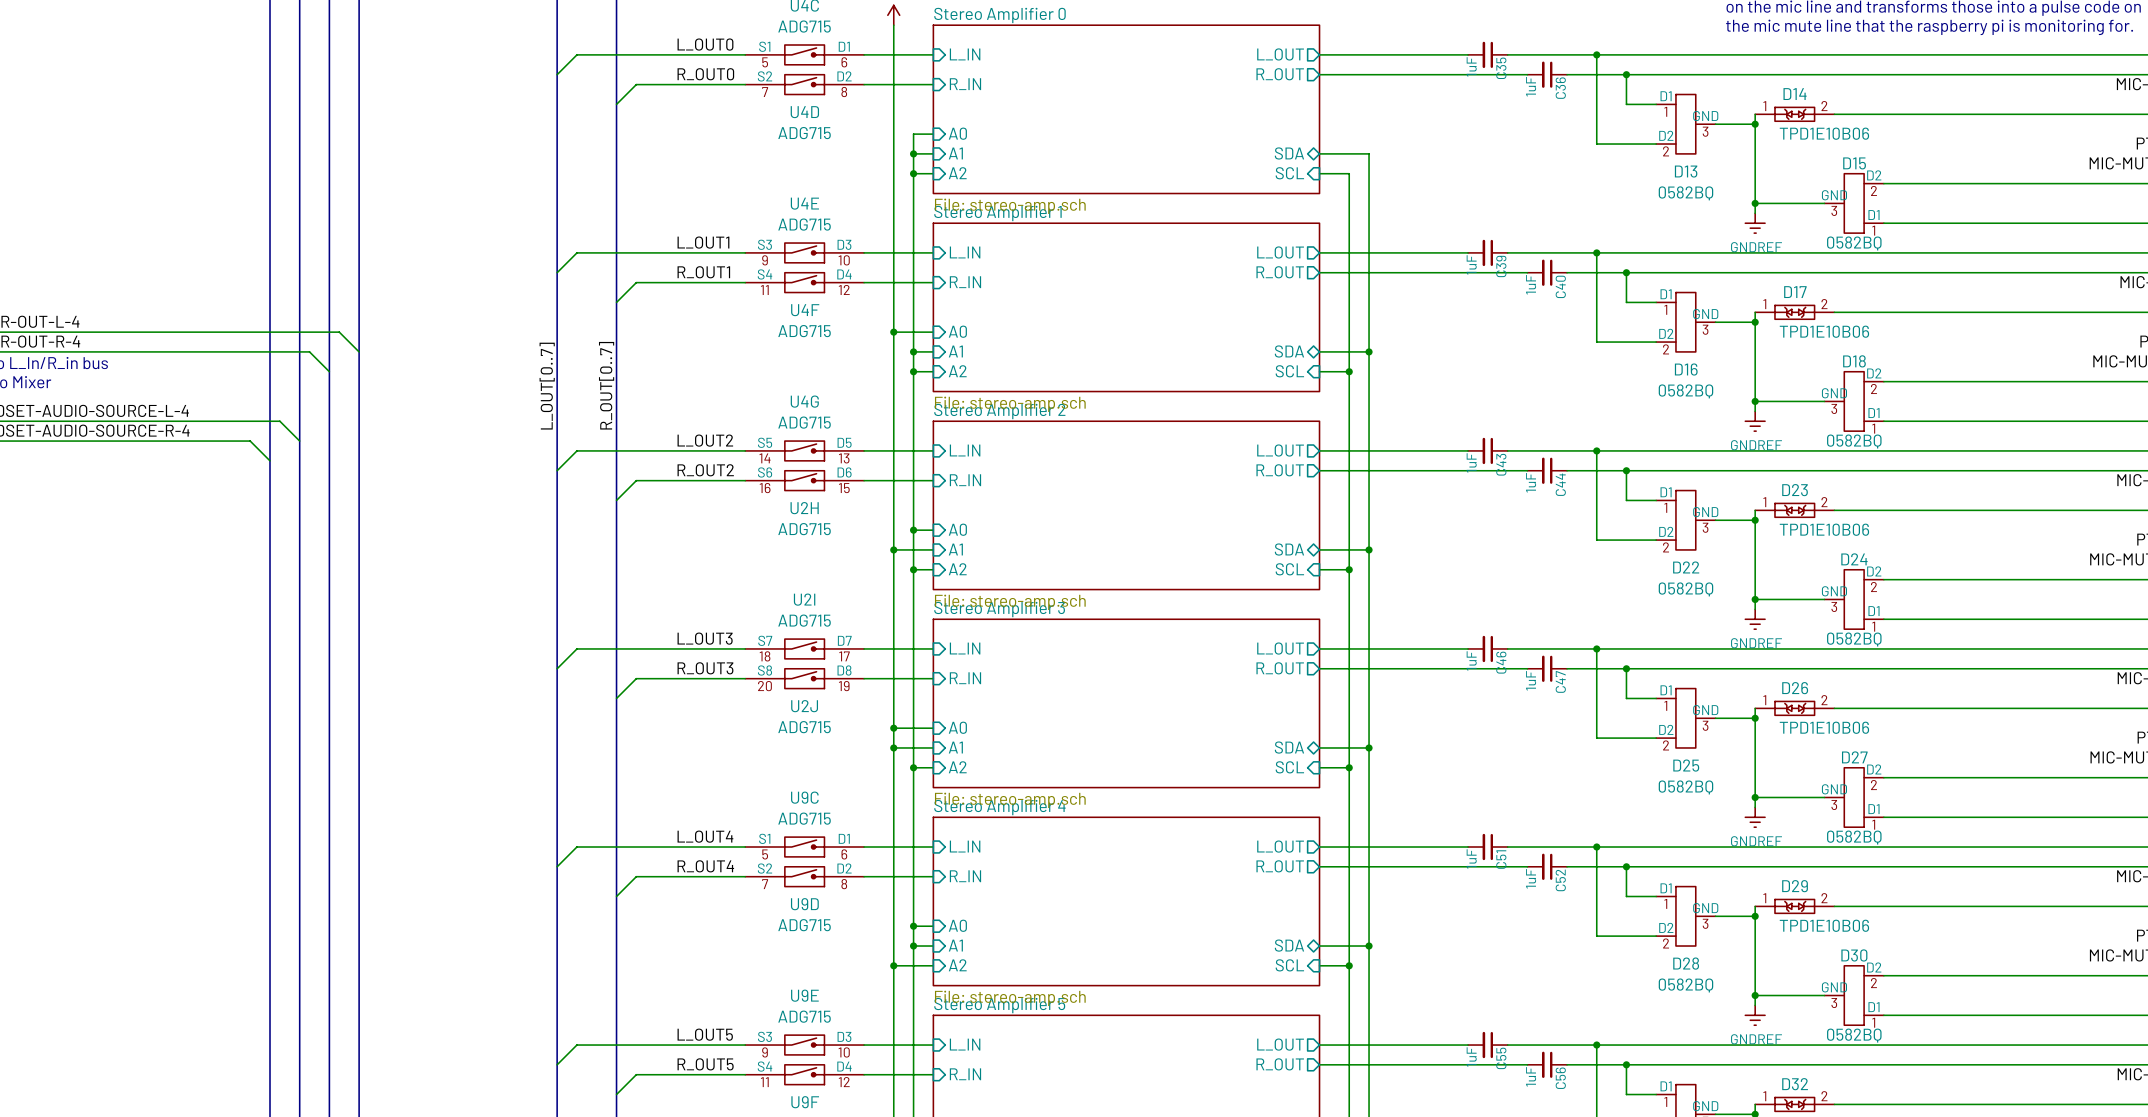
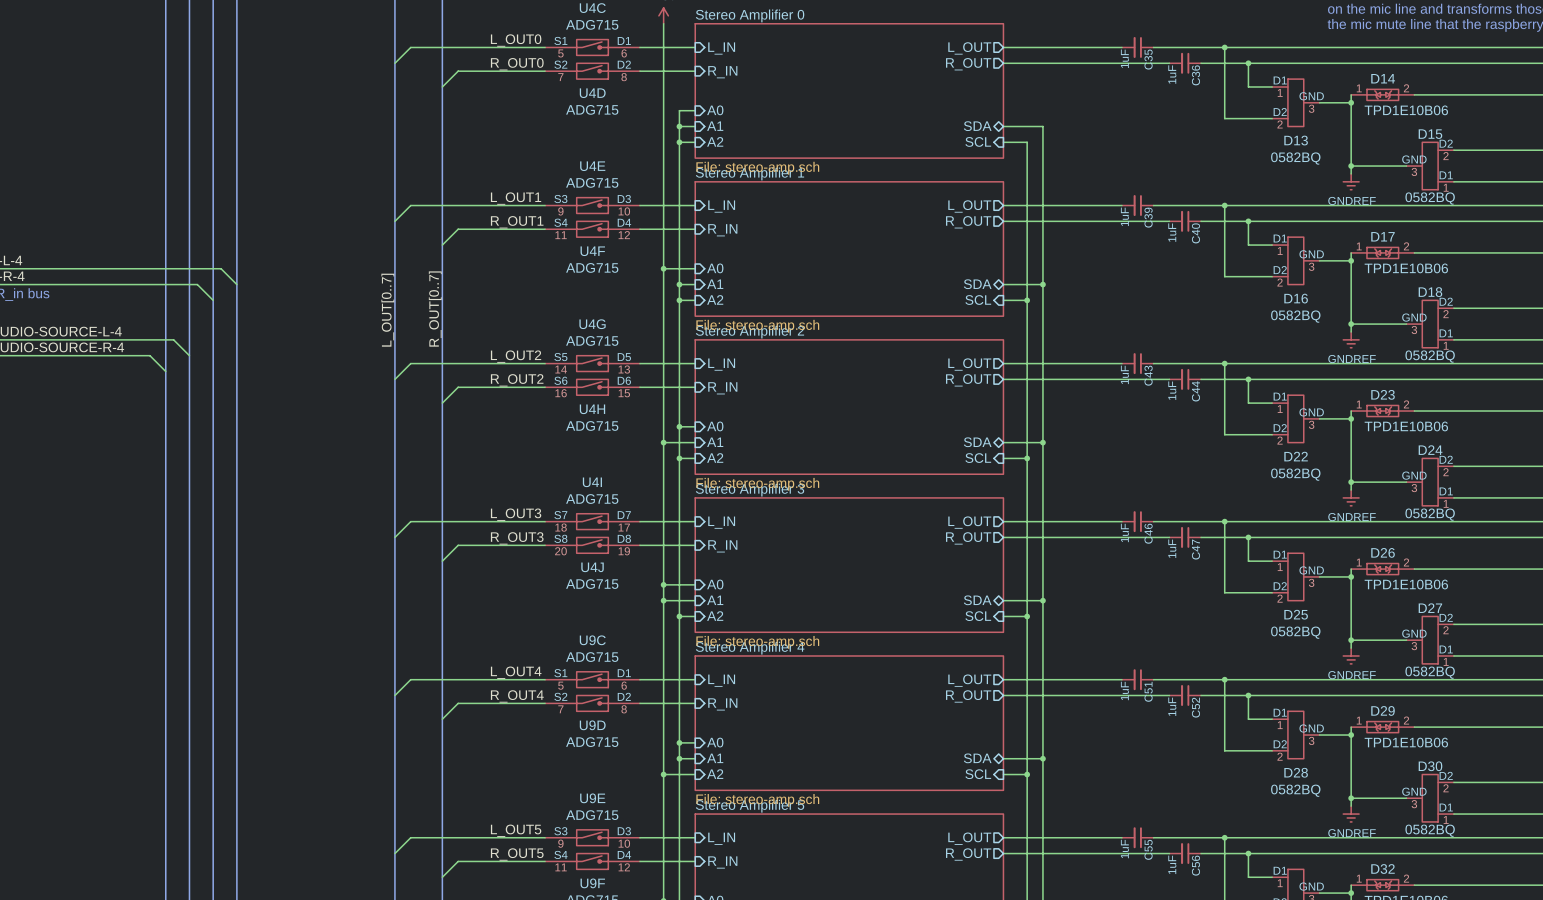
U2H name: U2H (804, 508) -> U4H (592, 409)
U2I name: U2I (804, 599) -> U4I (592, 482)
U2J name: U2J (804, 706) -> U4J (592, 567)

